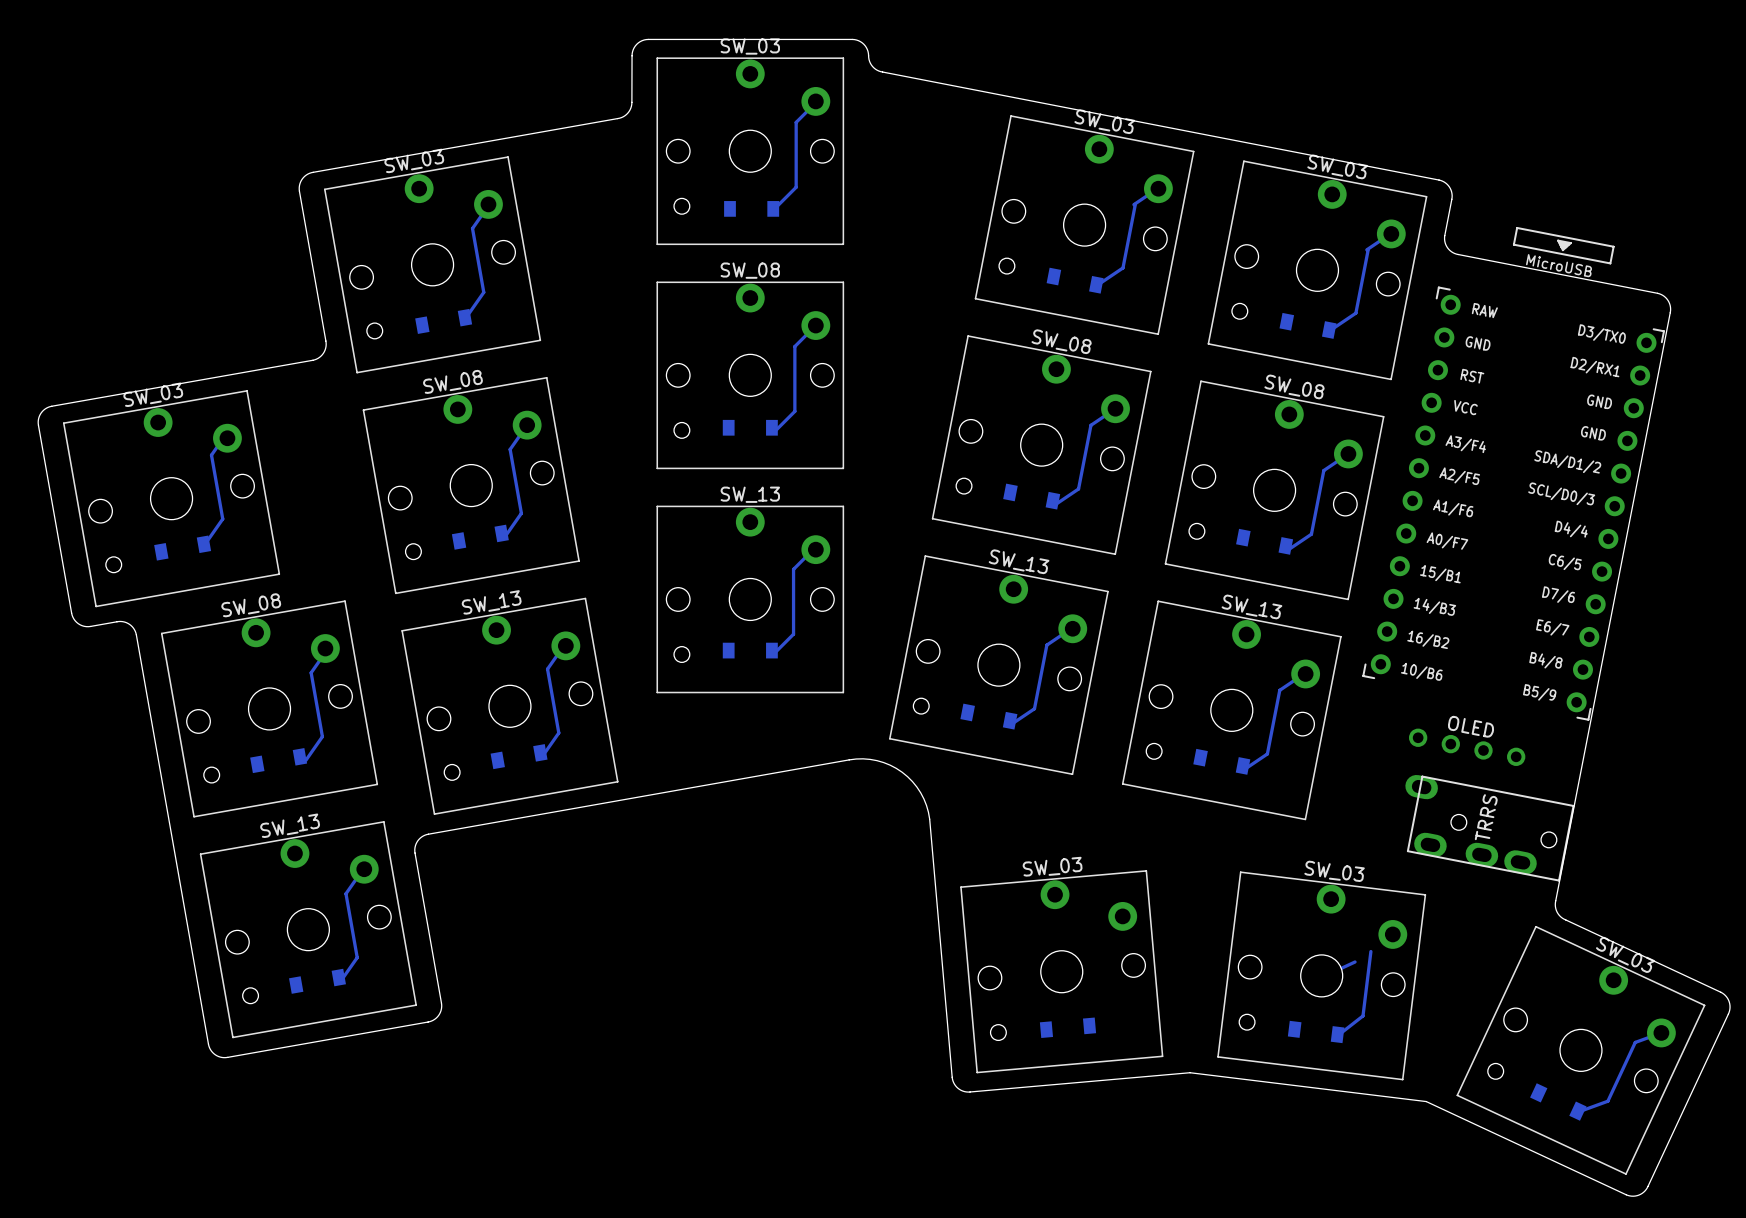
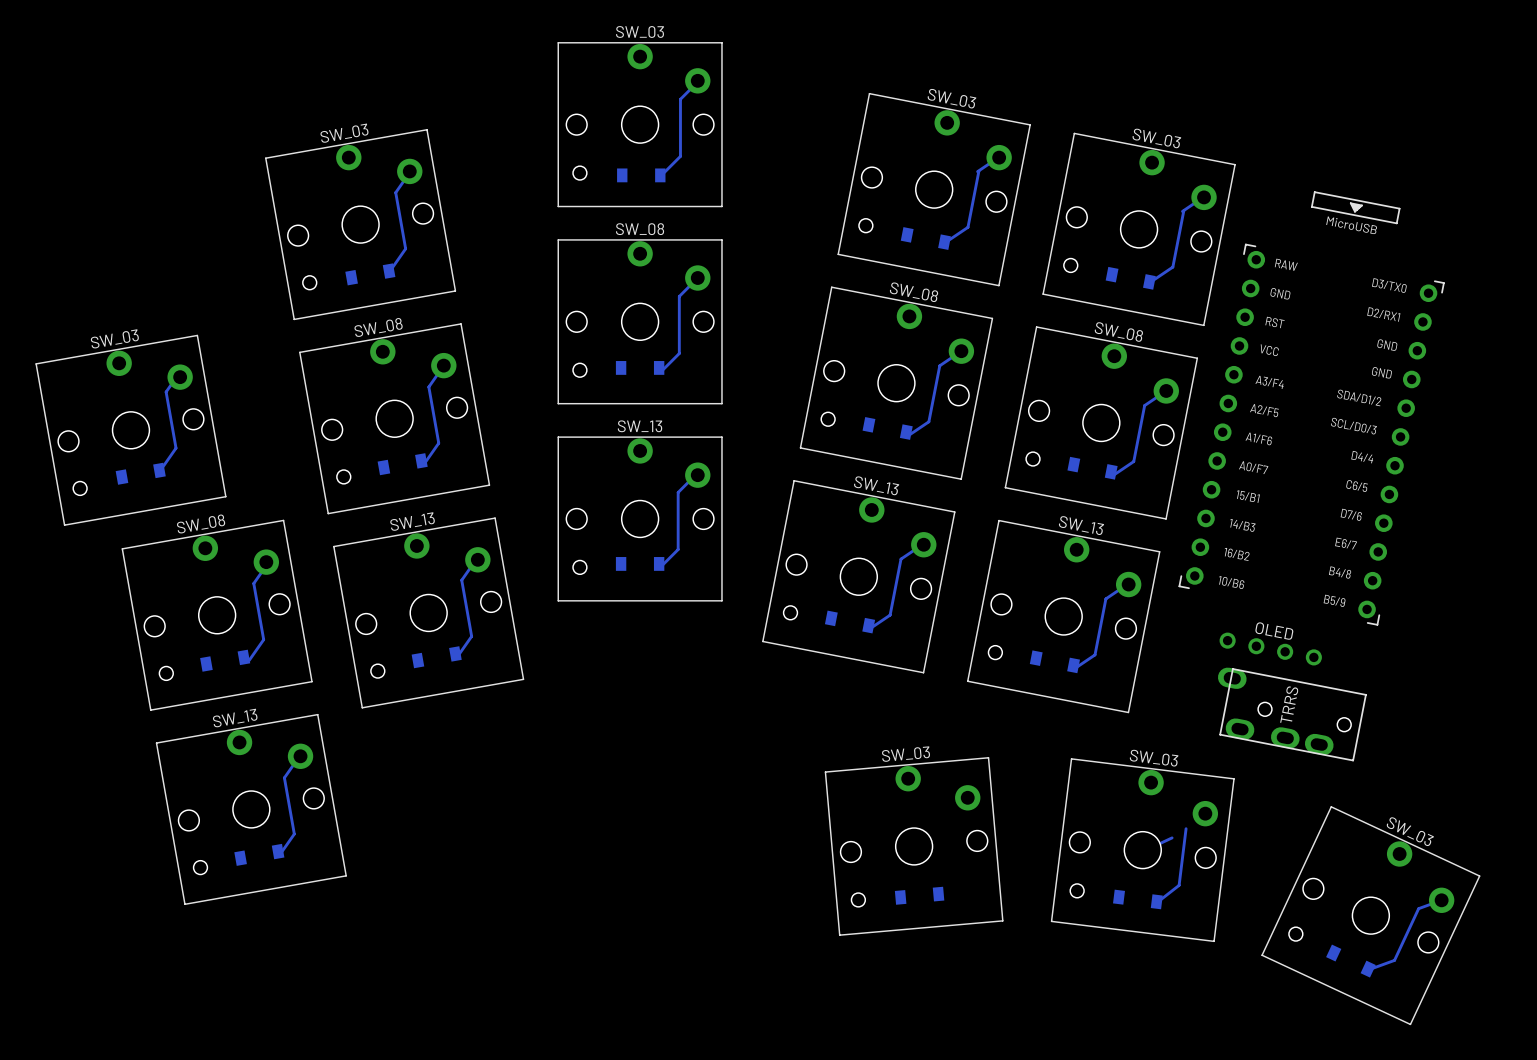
board edge: (648, 39) (854, 39) (865, 45) (871, 64) (880, 71) (1439, 180) (1447, 184) (1452, 193) (1444, 239) (1447, 247) (1453, 252) (1657, 293) (1666, 298) (1670, 305) (1670, 312) (1555, 904) (1557, 912) (1563, 919) (1720, 992) (1729, 1001) (1728, 1014) (1643, 1192) (1635, 1196) (1626, 1194) (1426, 1101) (1190, 1072) (970, 1091) (961, 1090) (955, 1085) (952, 1077) (928, 812) (920, 792) (907, 776) (890, 765) (870, 759) (849, 759) (424, 835) (417, 840) (414, 851) (441, 1003) (441, 1010) (437, 1016) (428, 1022) (227, 1057) (220, 1057) (212, 1052) (208, 1044) (135, 633) (130, 625) (124, 621) (86, 626) (78, 623) (72, 617) (38, 425) (39, 416) (43, 410) (51, 406) (318, 358) (324, 351) (326, 342) (299, 191) (300, 182) (304, 176) (313, 172) (621, 117) (627, 113) (631, 104) (633, 49) (638, 42) (648, 39) -> none
part footprint: [1405, 774, 1575, 882] -> [1217, 667, 1367, 762]

